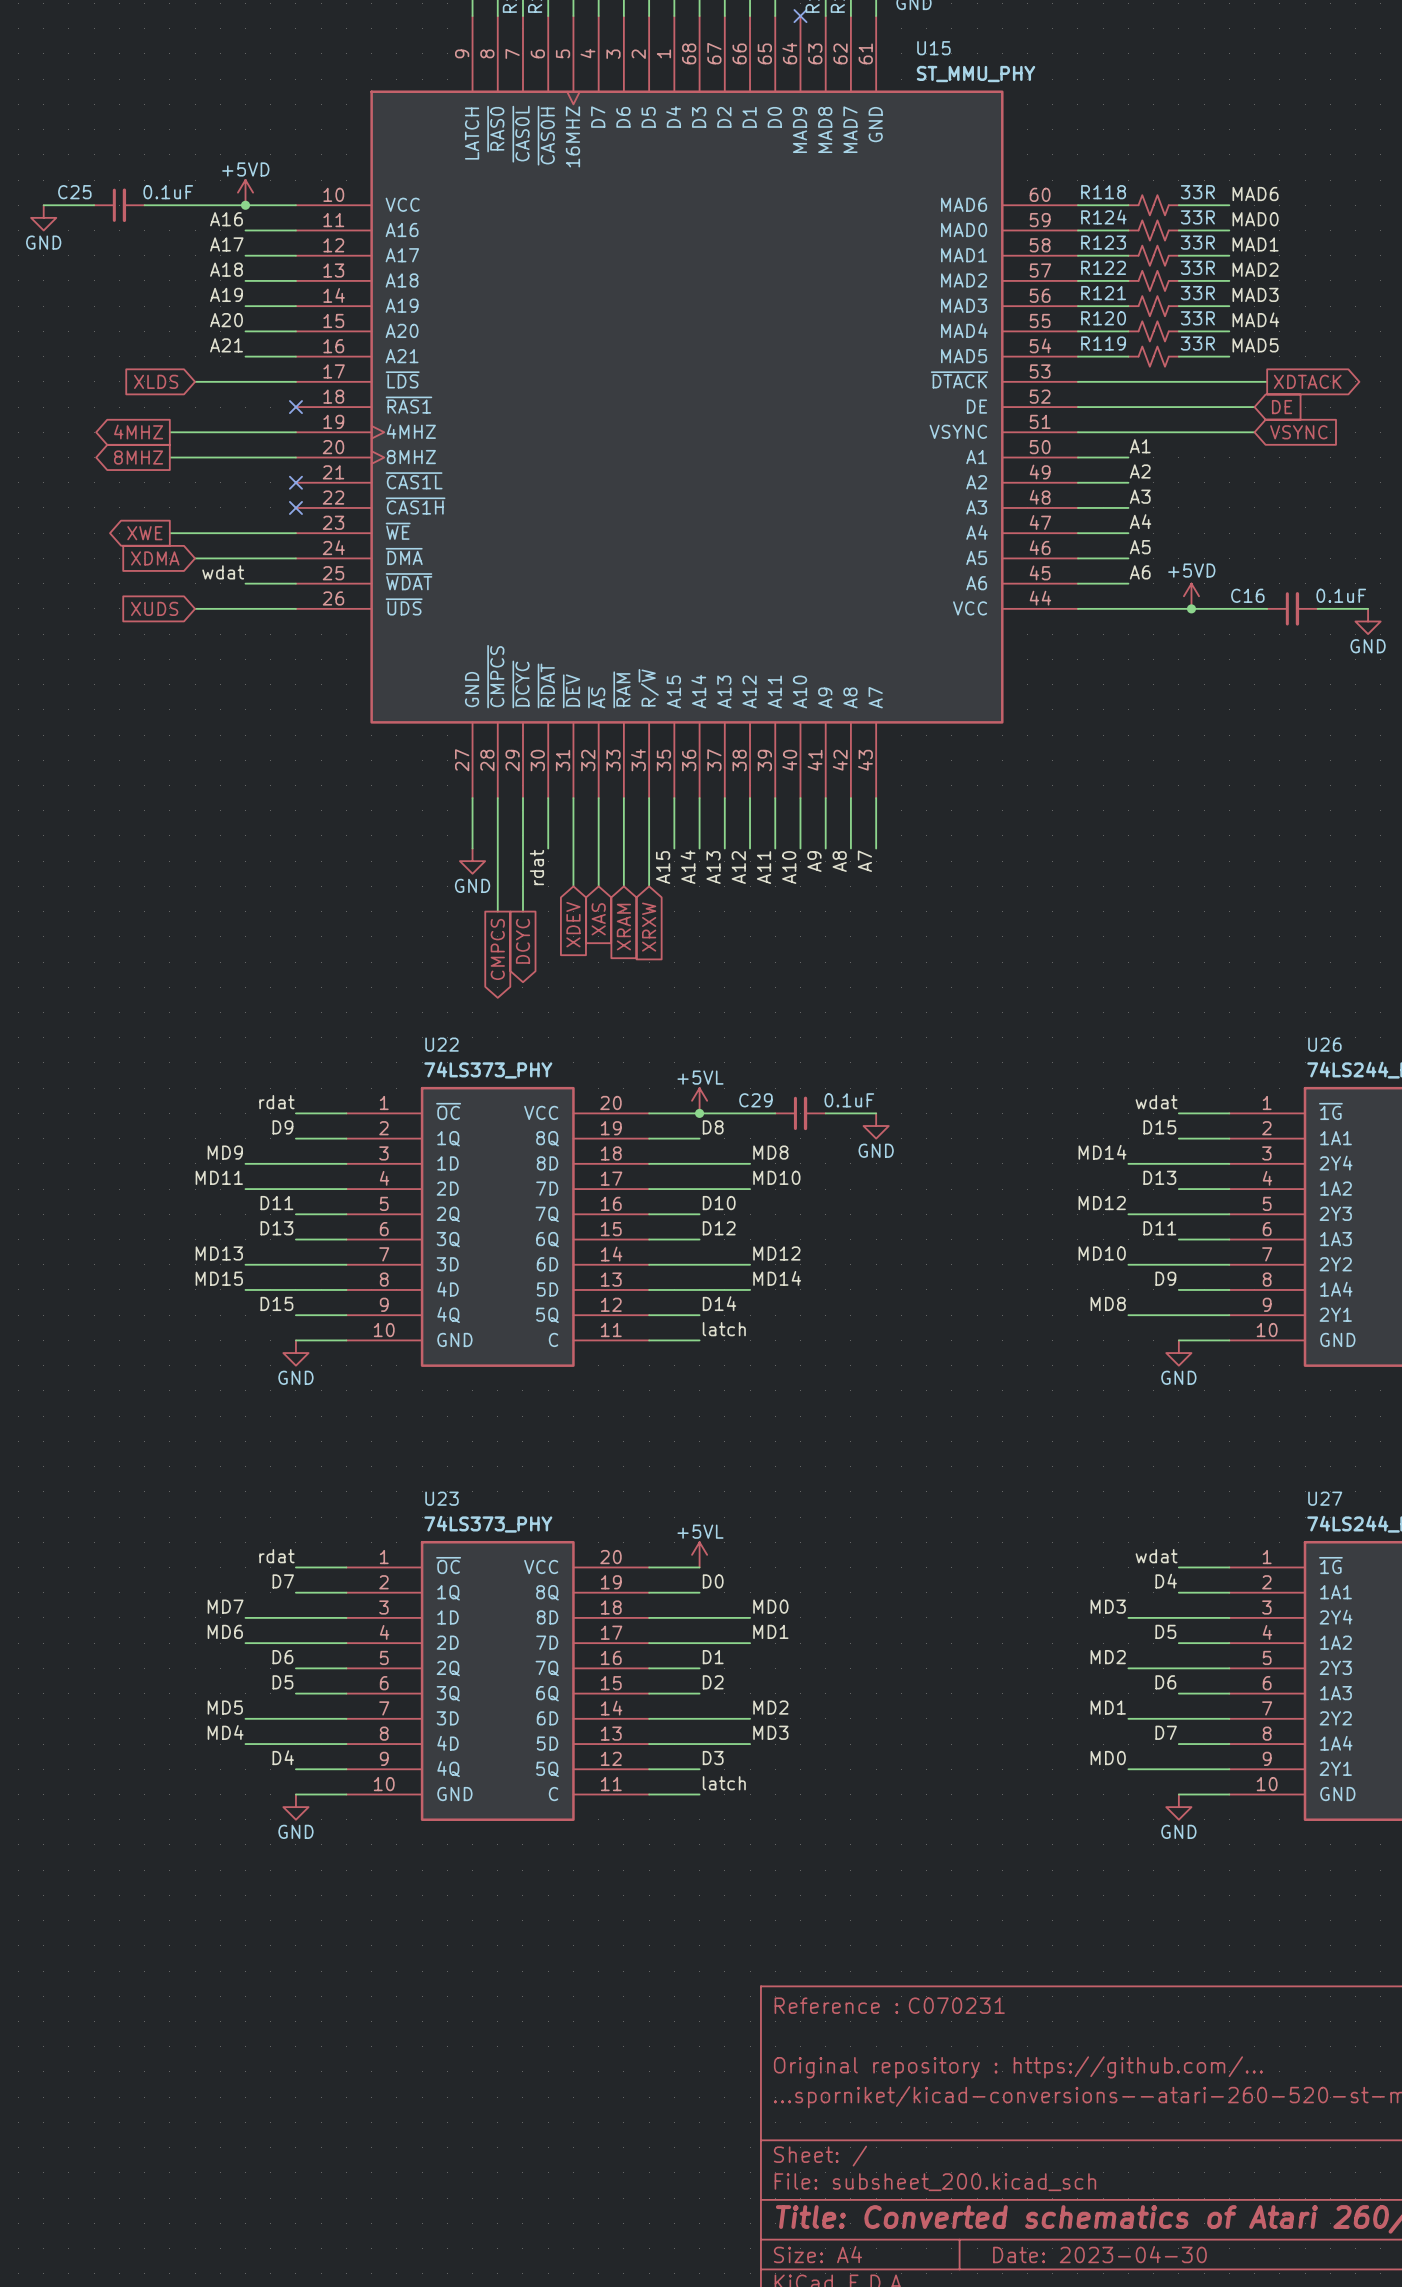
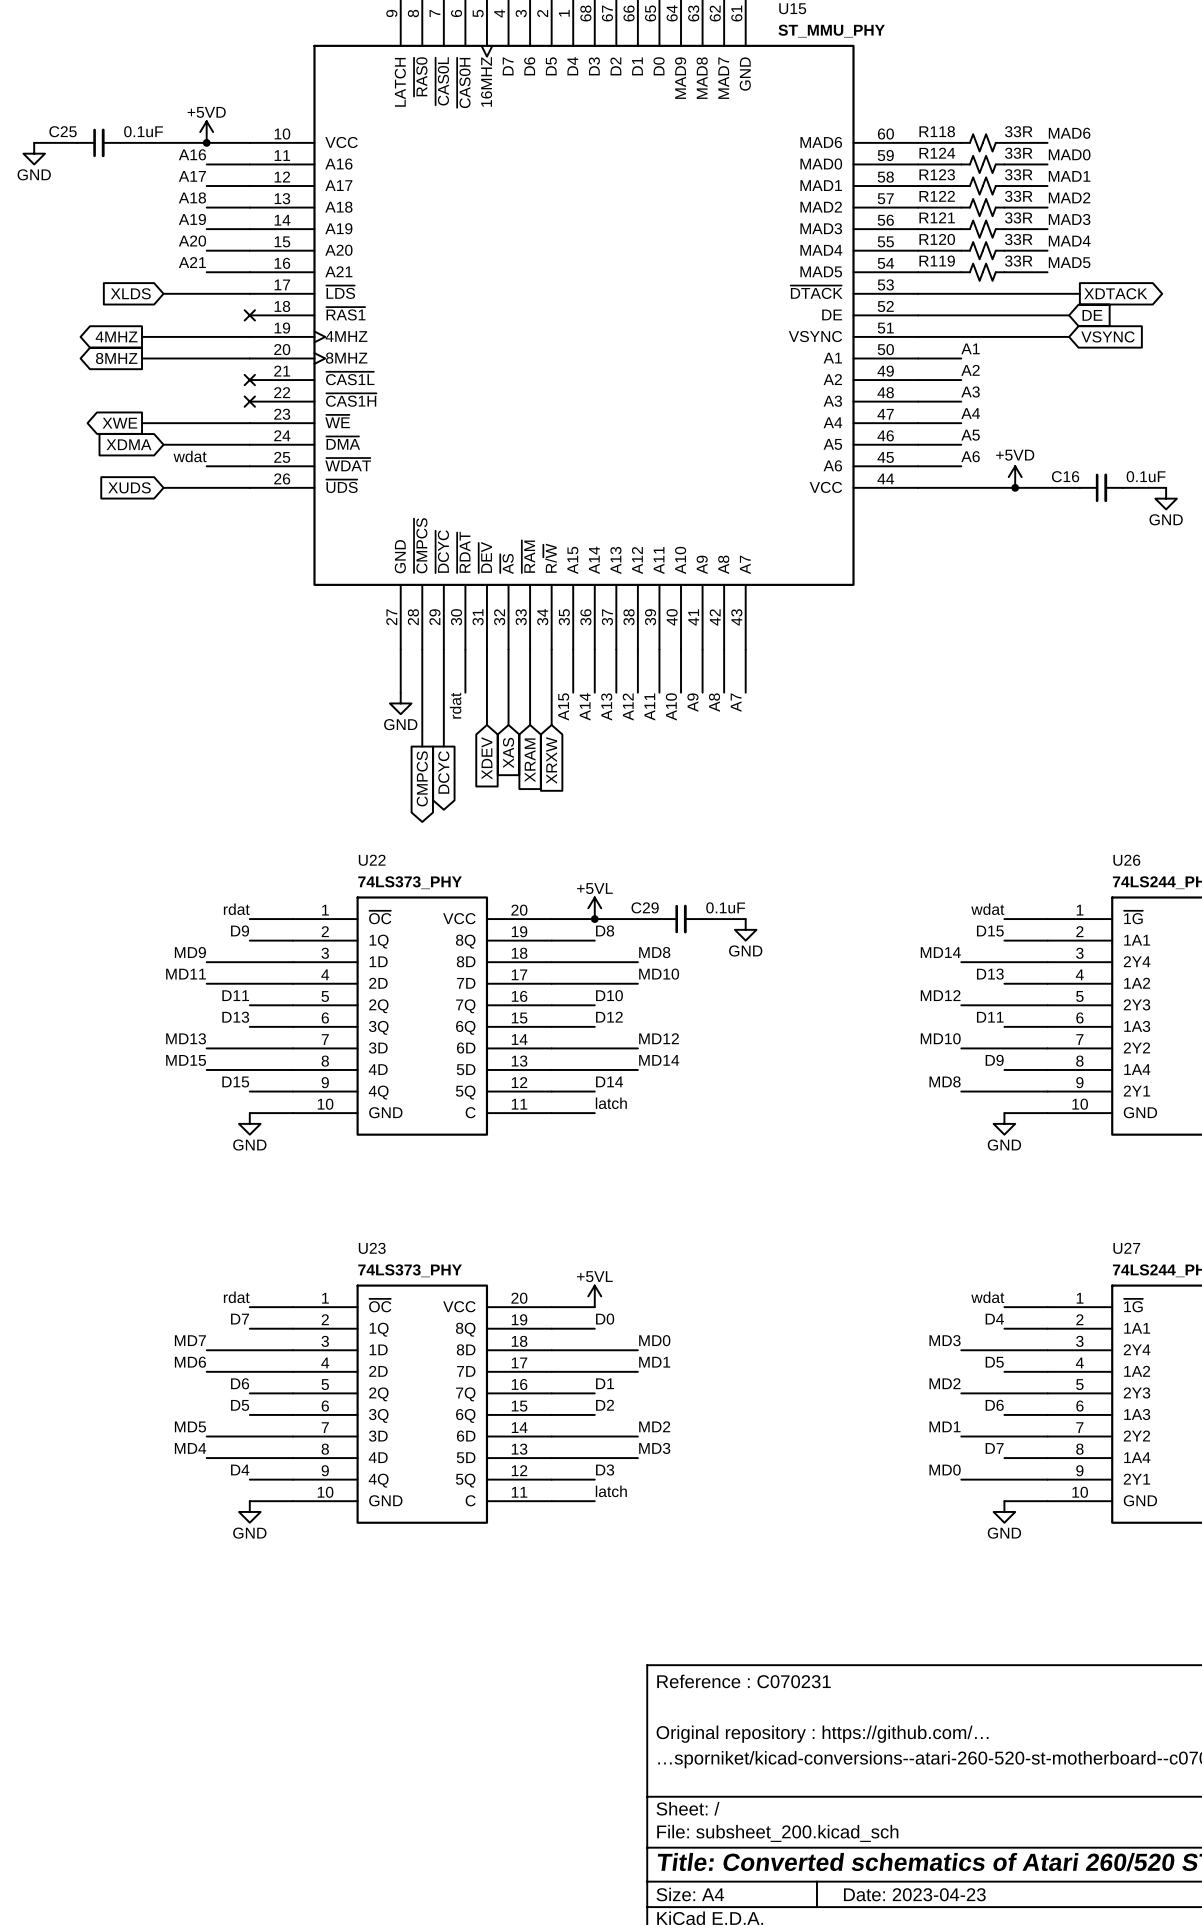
title block: Date: 2023-04-30 (1099, 2254) -> Date: 2023-04-23 (914, 1894)

